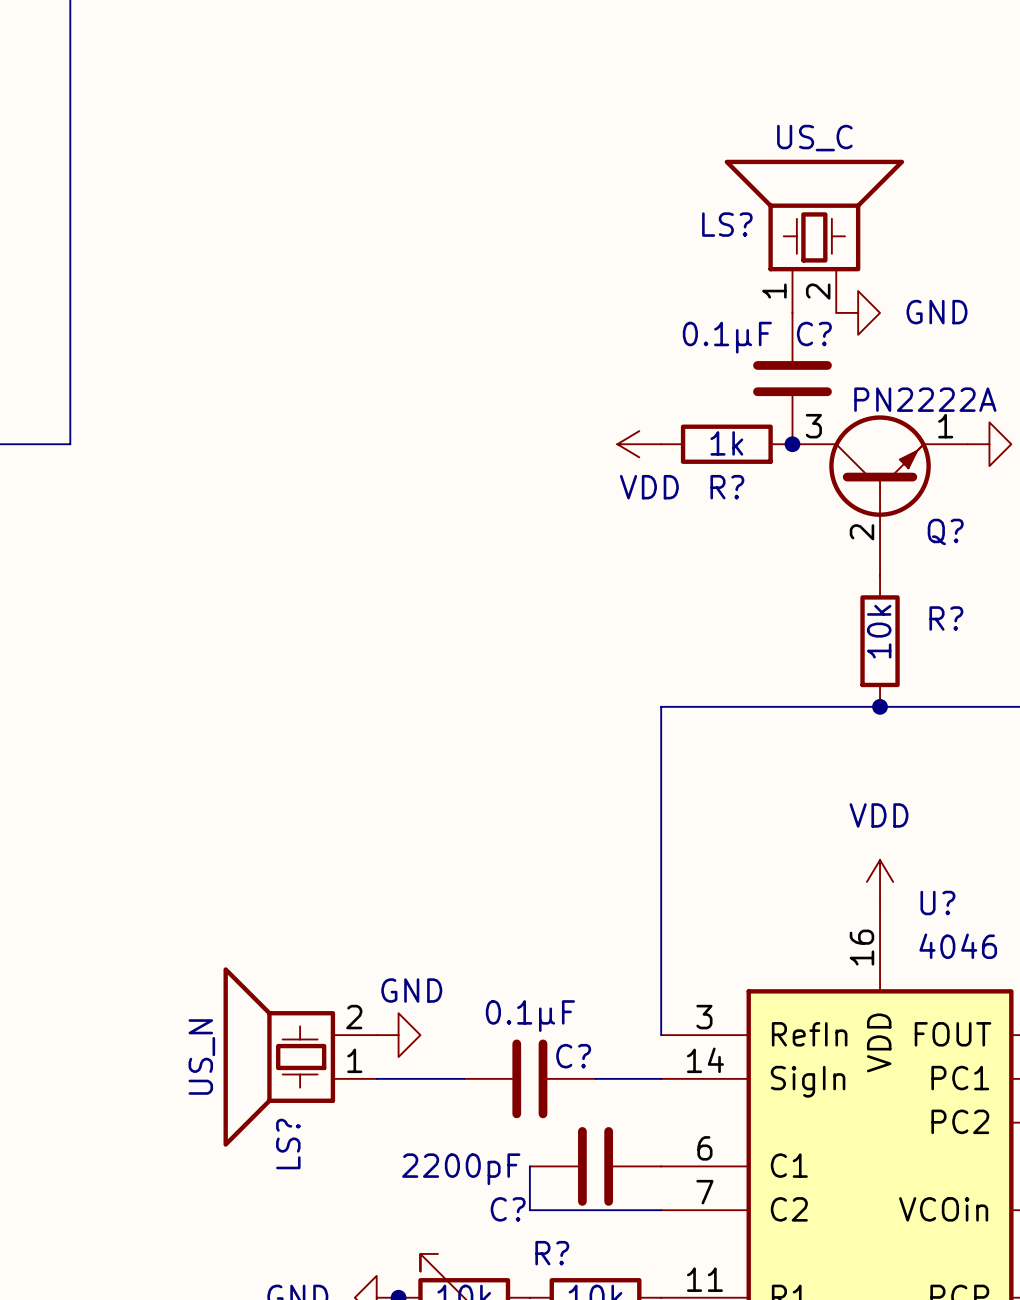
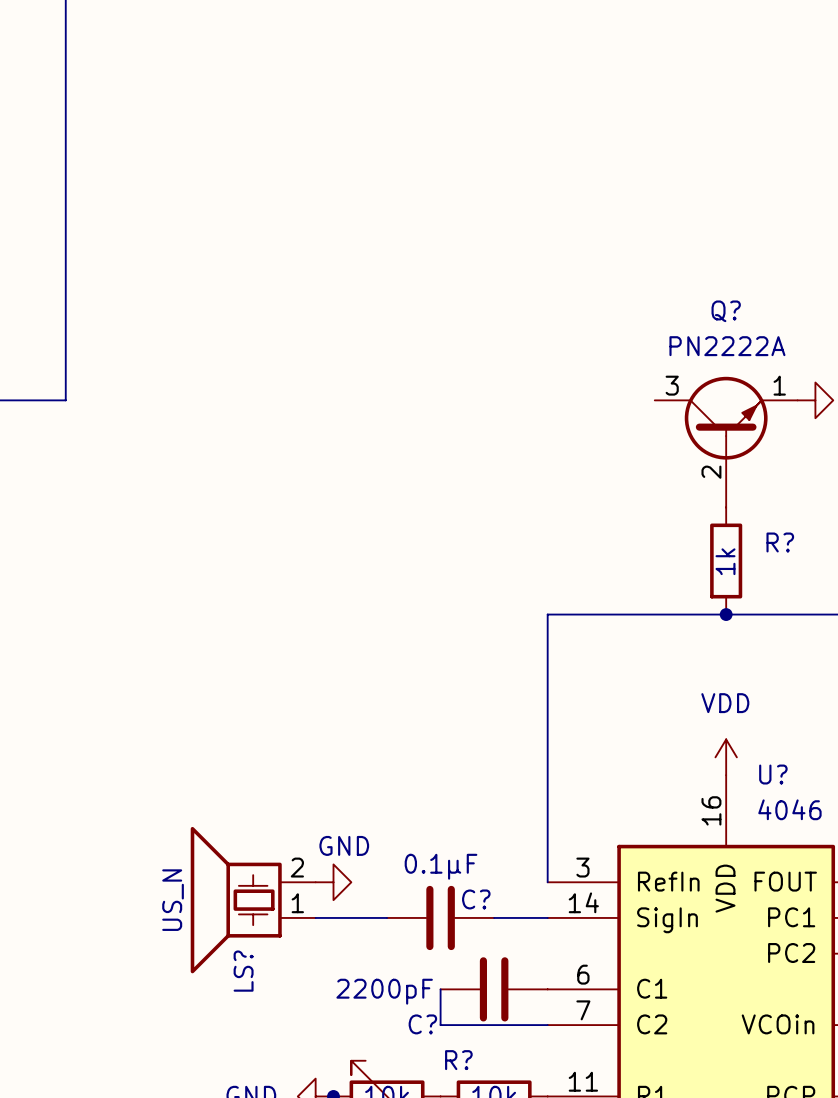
LS?: US_C (814, 236) -> none
power symbol: GND (858, 312) -> none
C?: 0.1µF (792, 378) -> none
Q? value position: PN2222A (925, 399) -> PN2222A (727, 346)
power symbol: VDD (639, 444) -> none
R?: 1k (726, 444) -> none
junction: (792, 444) -> none
Q? name position: Q? (945, 532) -> Q? (726, 311)
R? value: 10k (879, 631) -> 1k (725, 561)

